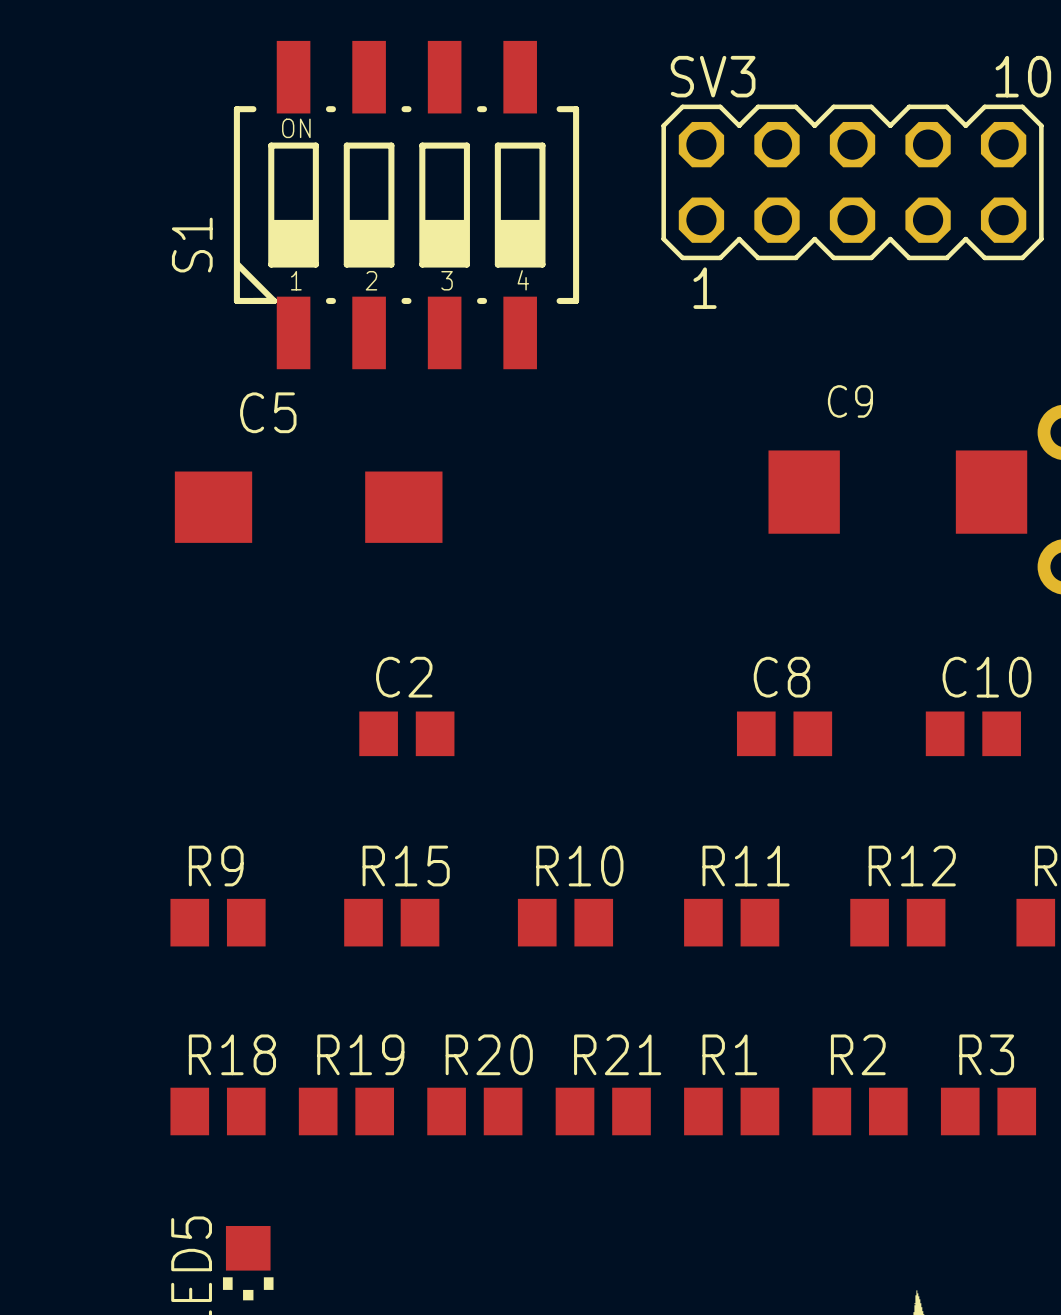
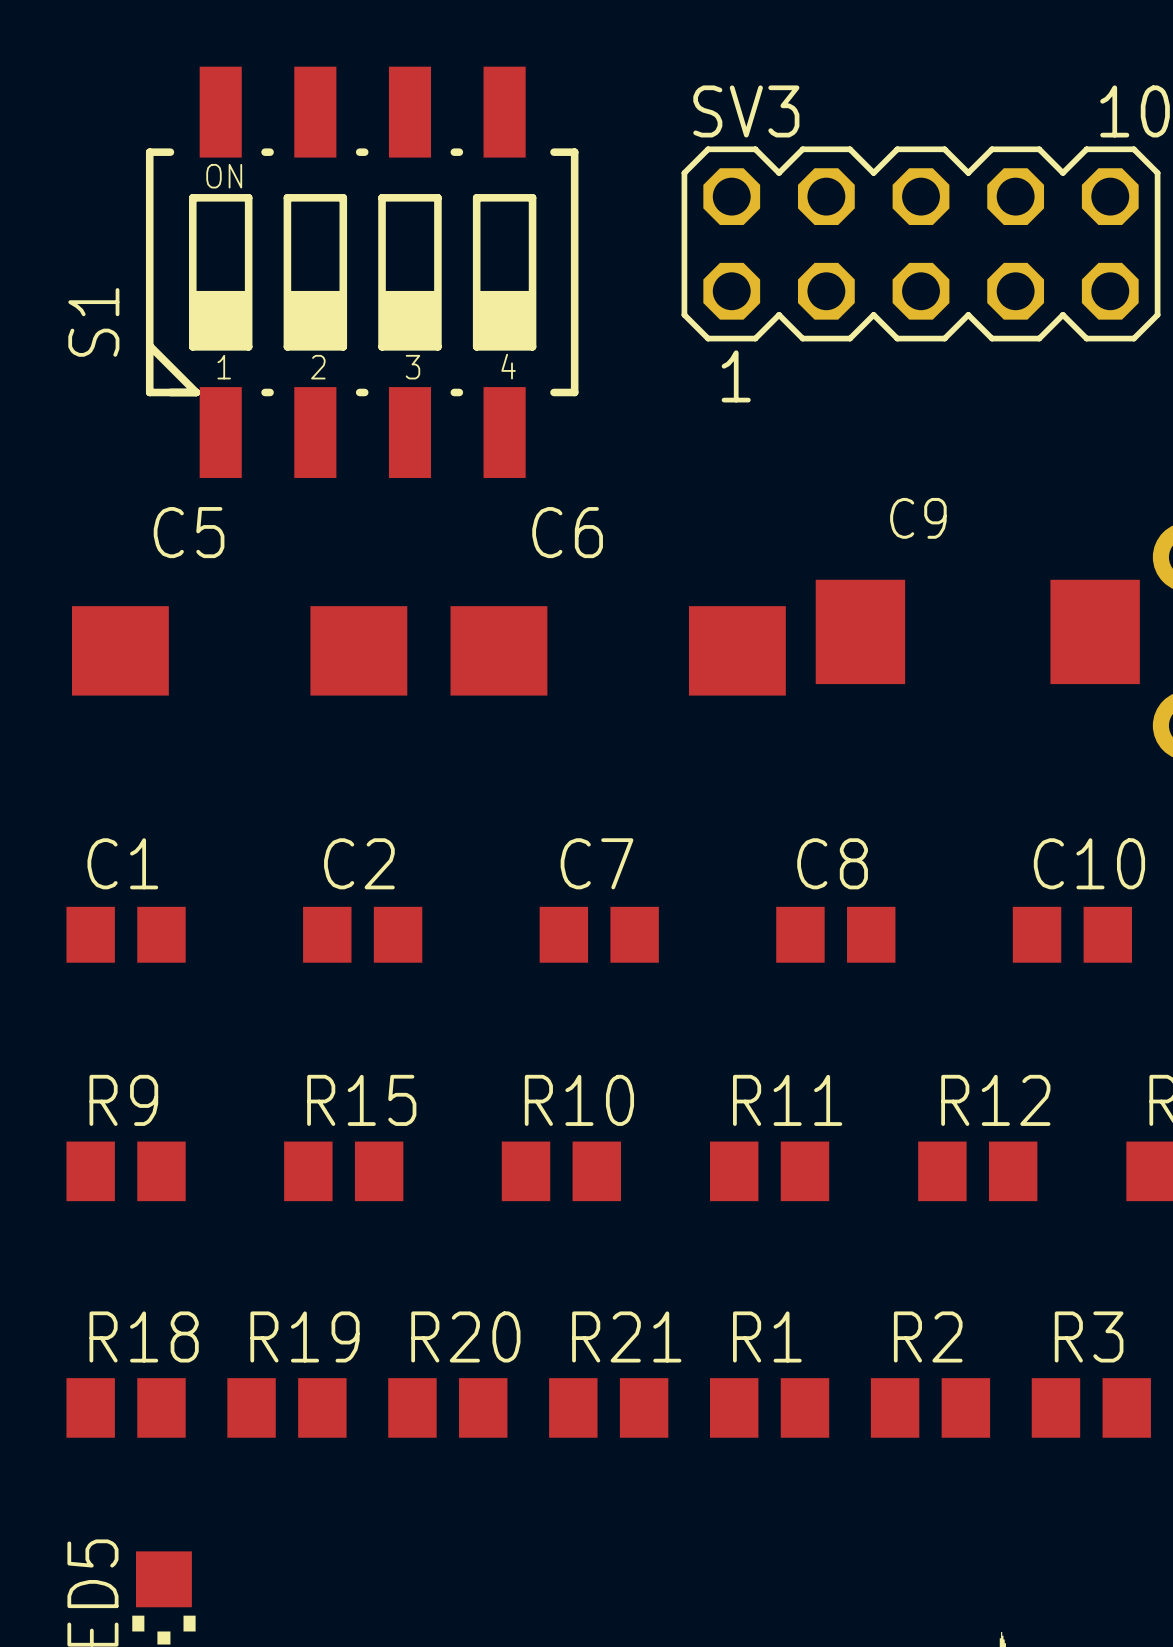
C6: none -> (618, 650)
C1: none -> (126, 934)
C7: none -> (599, 934)

